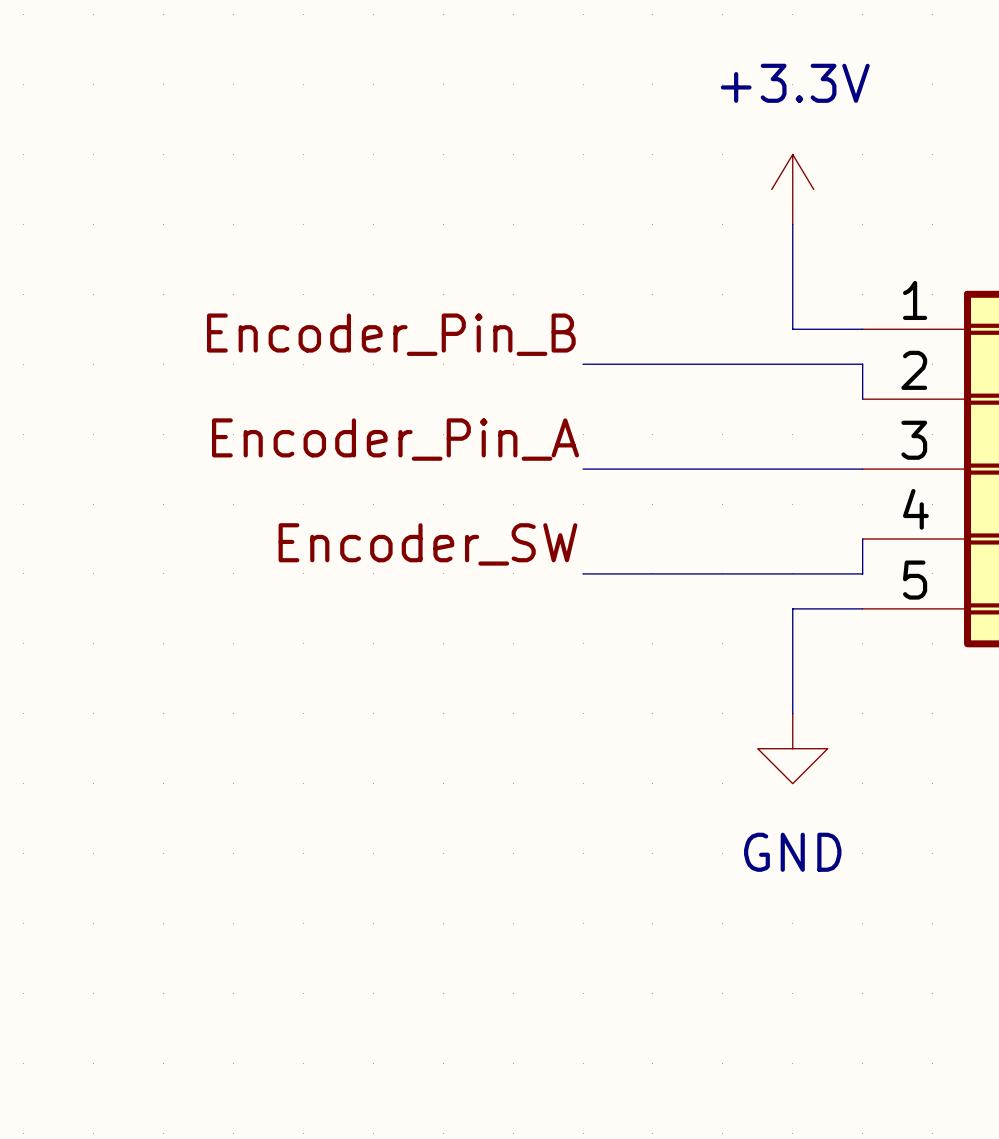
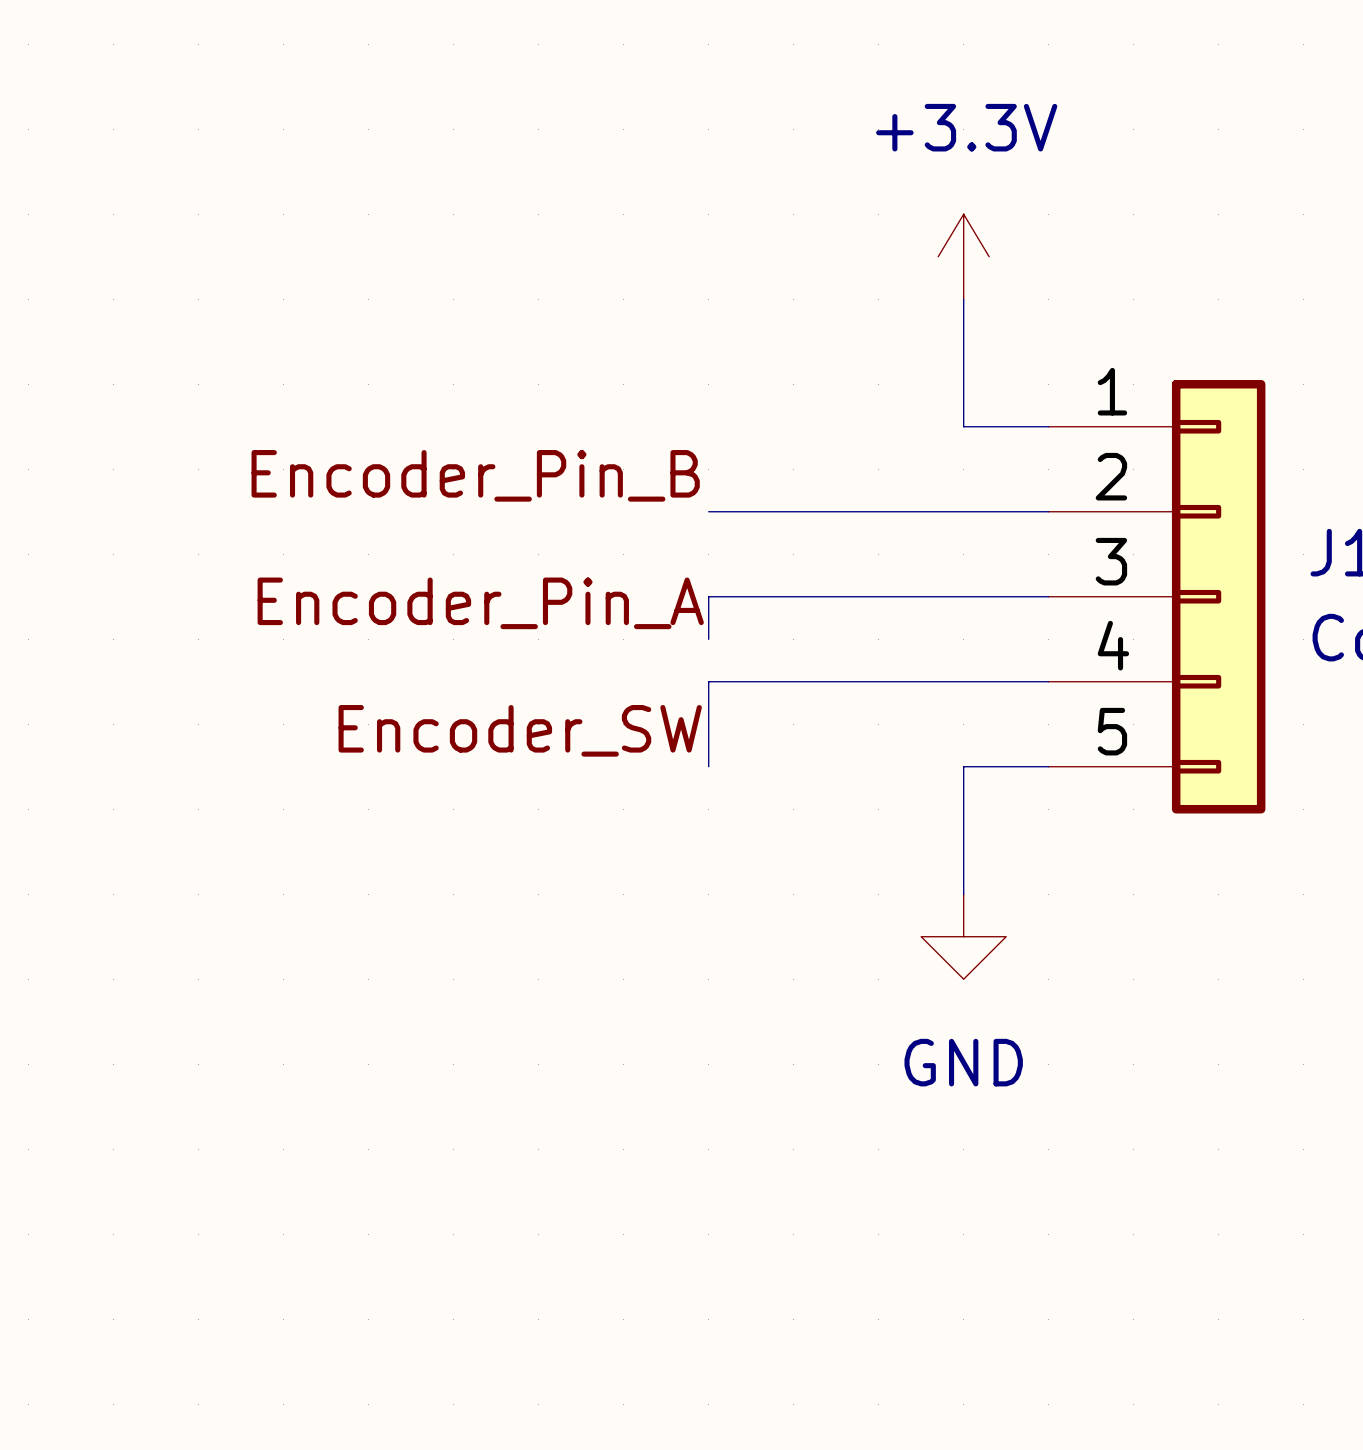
label position: Encoder_Pin_B (391, 334) -> Encoder_Pin_B (475, 475)
wire: (583, 364) (862, 364) (862, 399) -> (708, 511) (1048, 511)
label position: Encoder_Pin_A (395, 439) -> Encoder_Pin_A (480, 603)
wire: none -> (708, 596) (708, 639)
wire: (862, 538) (862, 573) (583, 573) -> (1048, 681) (708, 681) (708, 766)
label position: Encoder_SW (427, 544) -> Encoder_SW (520, 730)

